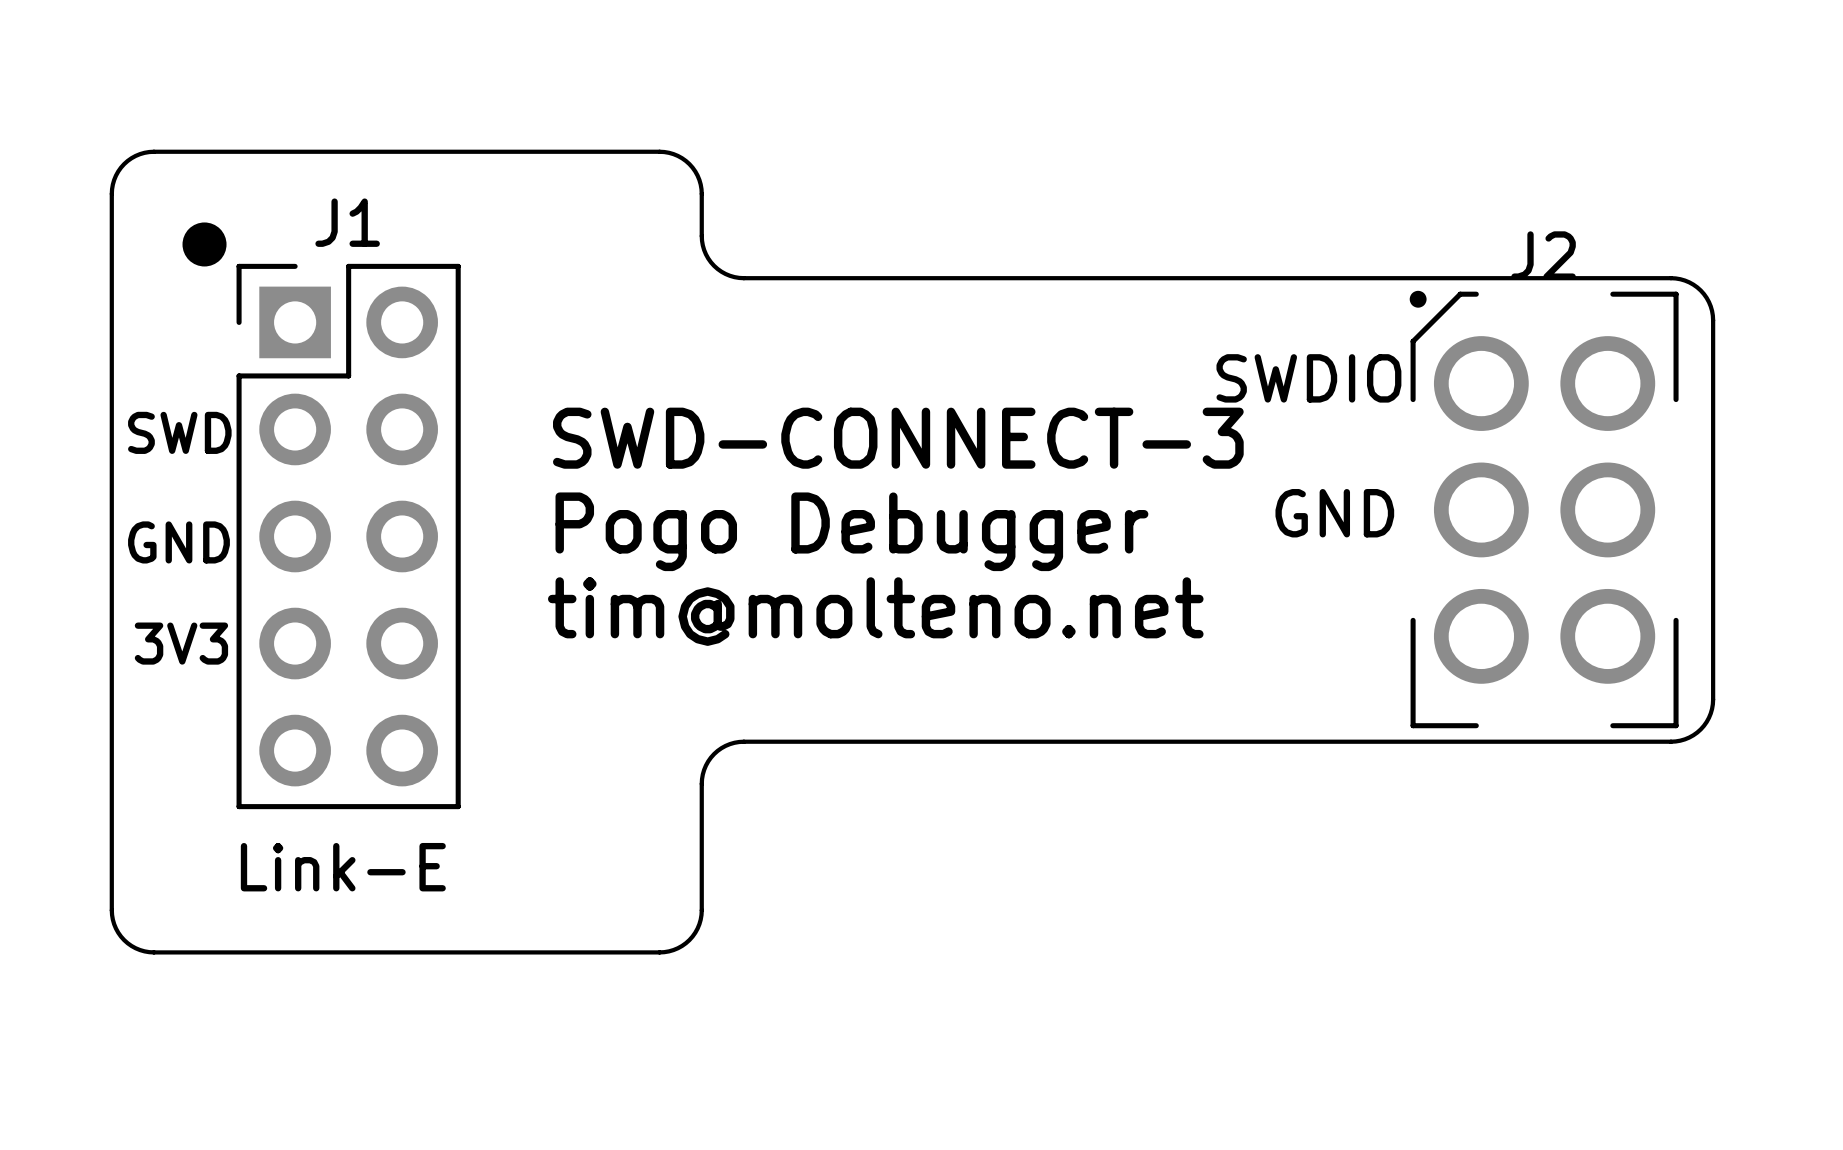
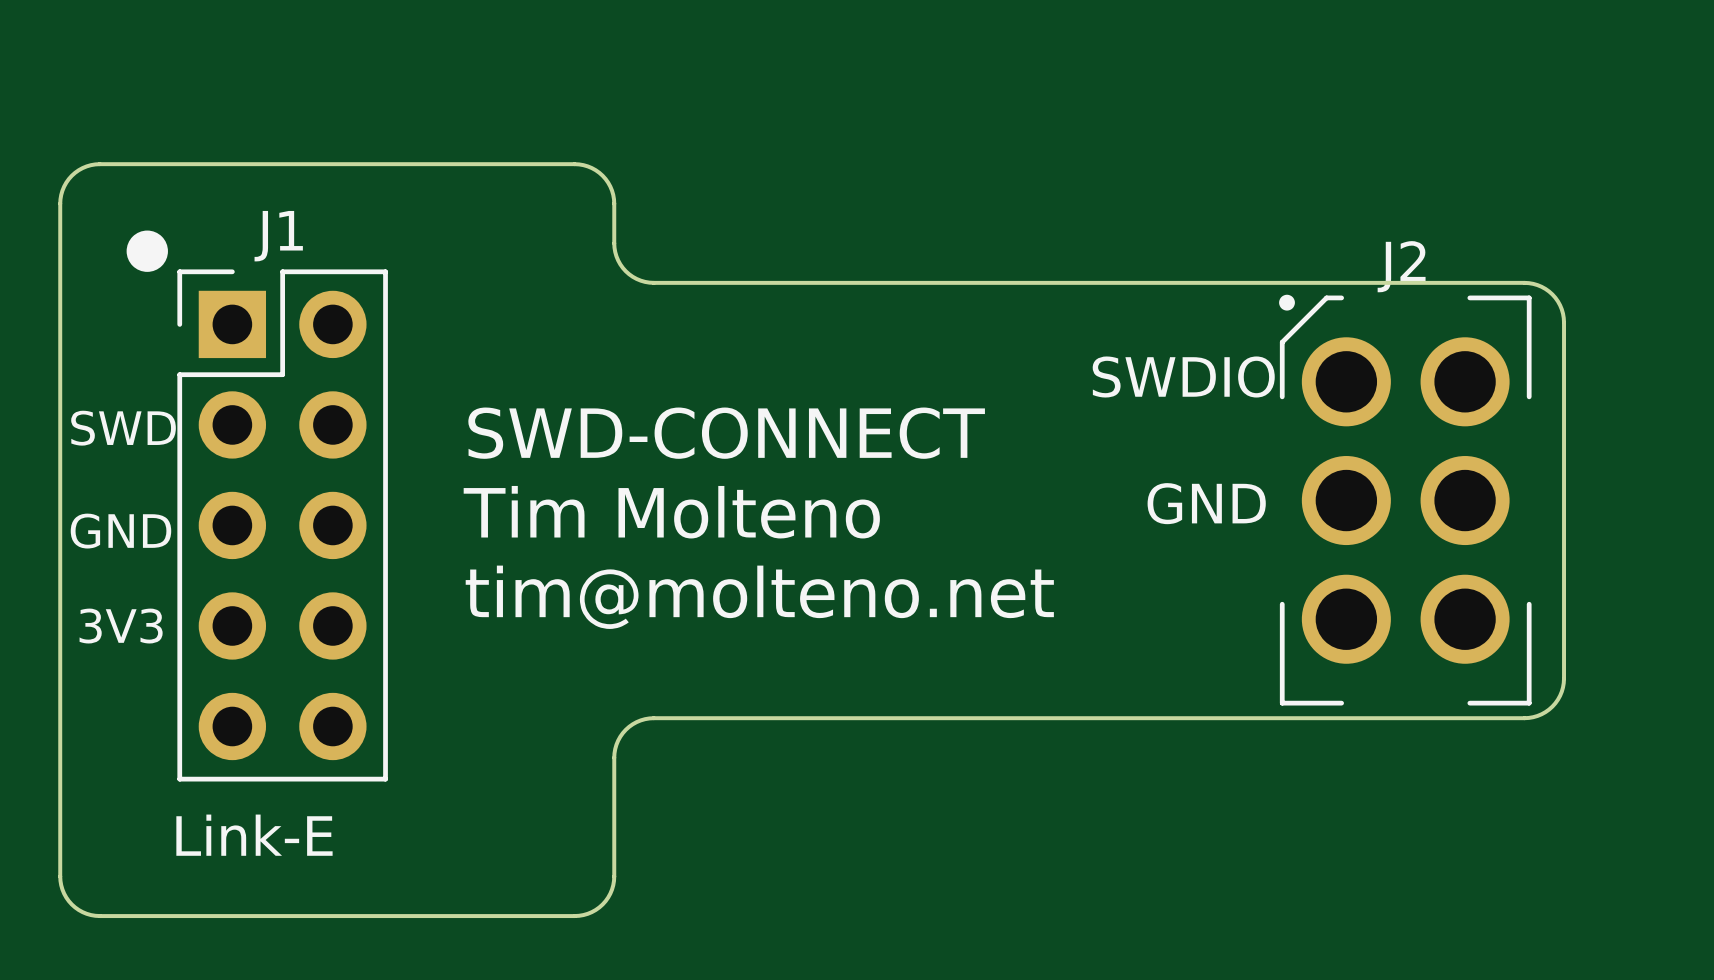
text: SWD-CONNECT-3 (898, 438) -> SWD-CONNECT (726, 433)
text: Pogo Debugger (851, 531) -> Tim Molteno (671, 512)

